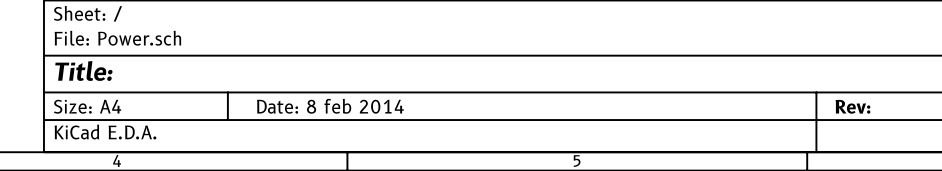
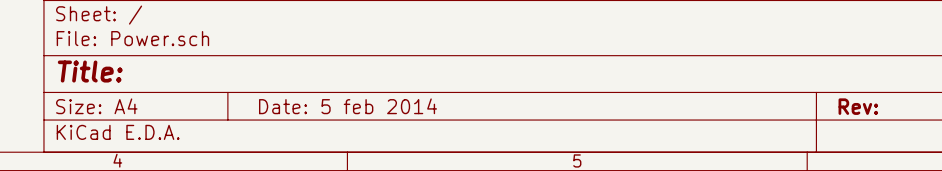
title block: Date: 8 feb 2014 (330, 106) -> Date: 5 feb 2014 (348, 106)

